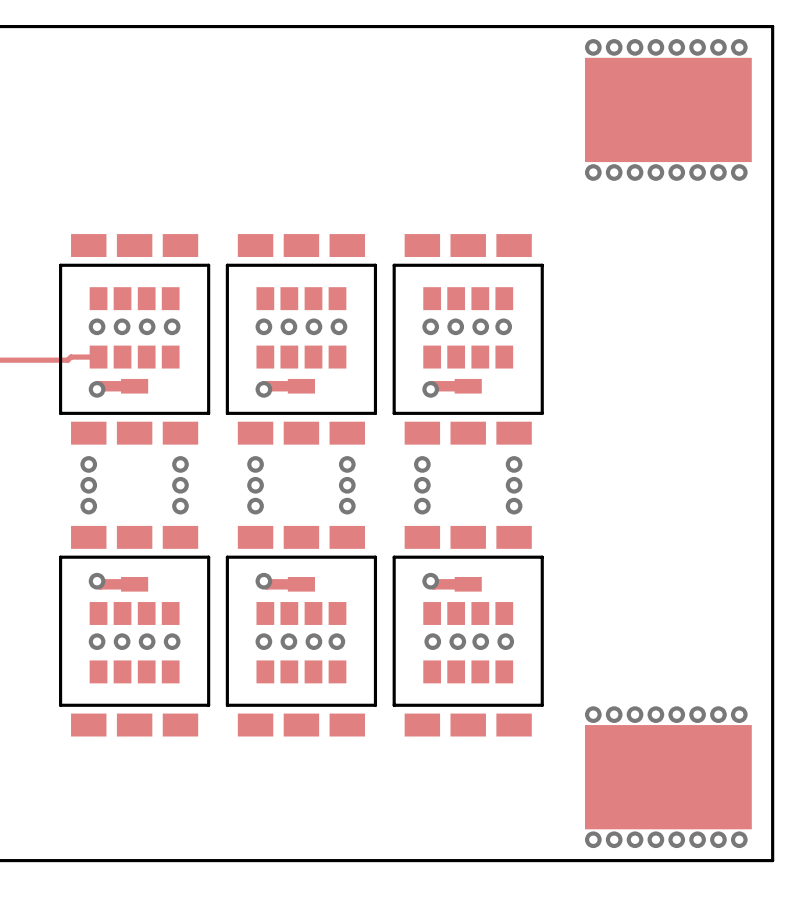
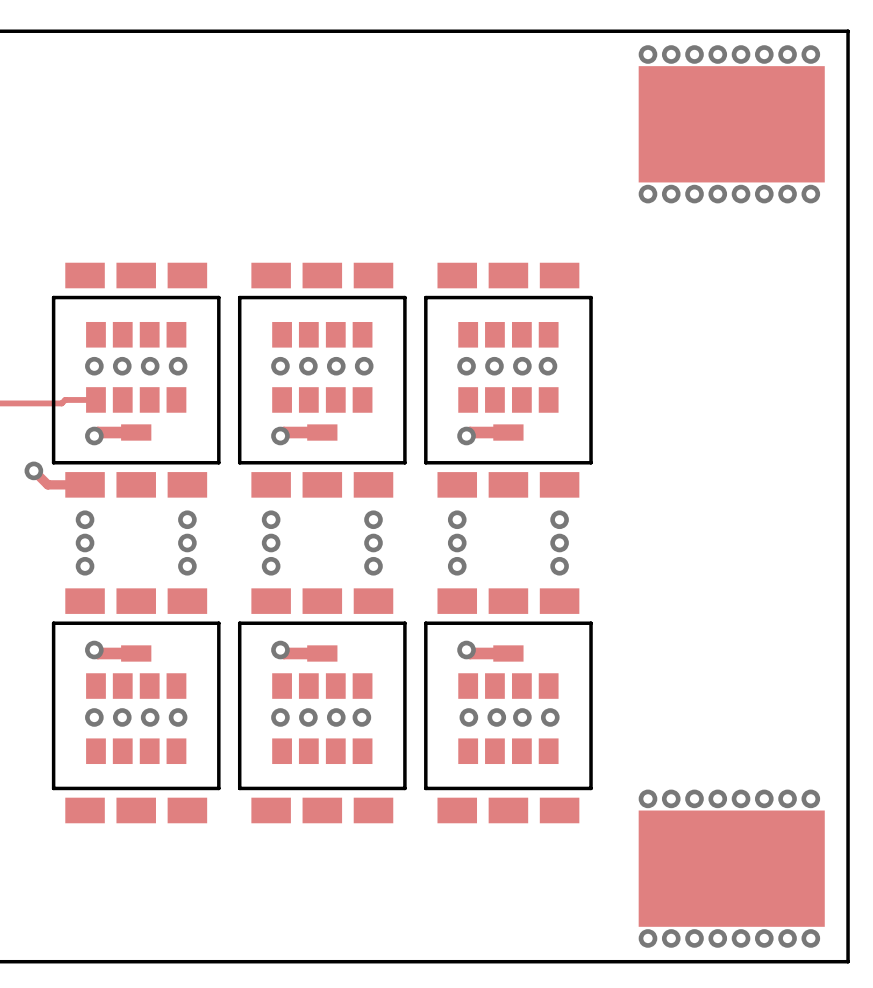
track: none -> (33, 470) (47, 484) (85, 484)
via: none -> (33, 470)

